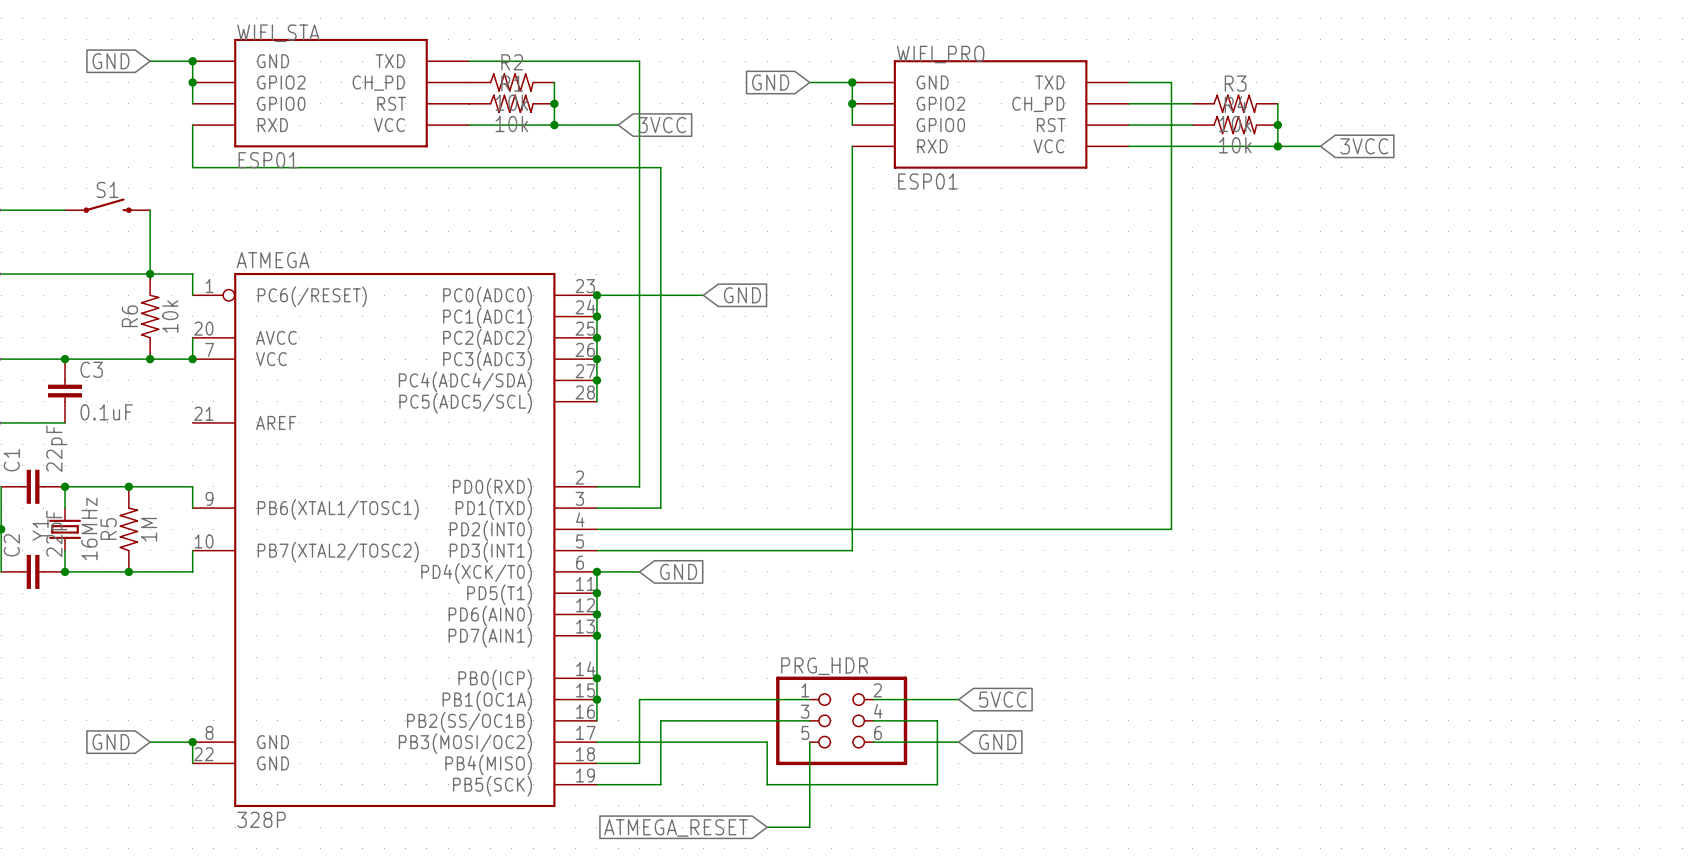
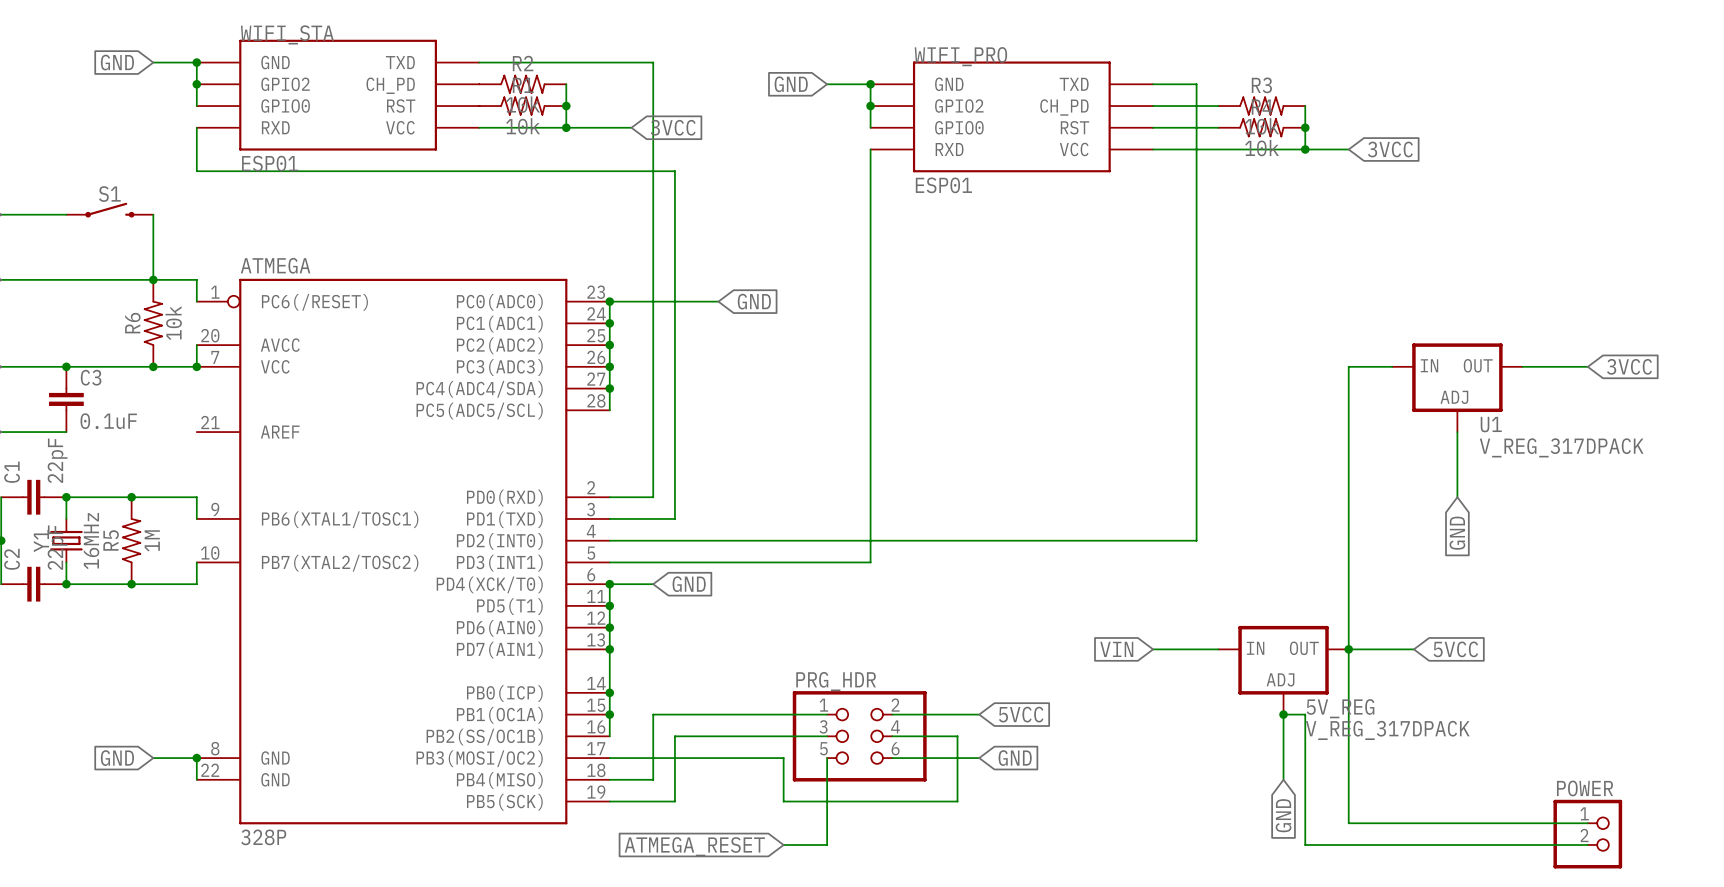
wire: none -> (1392, 366) (1348, 366) (1348, 823) (1587, 823)
wire: none -> (1522, 366) (1587, 366)
global label: none -> 3VCC (1629, 366)
U1: none -> V_REG_317DPACK (1457, 387)
wire: none -> (1457, 432) (1457, 497)
global label: none -> GND (1457, 533)
global label: none -> VIN (1116, 649)
wire: none -> (1153, 649) (1218, 649)
wire: none -> (1348, 649) (1413, 649)
junction: none -> (1348, 649)
global label: none -> 5VCC (1455, 649)
5V_REG: none -> V_REG_317DPACK (1283, 670)
junction: none -> (1283, 714)
wire: none -> (1283, 779) (1283, 714) (1305, 714) (1305, 844) (1587, 844)
global label: none -> GND (1283, 815)
POWER: none -> (1587, 834)

